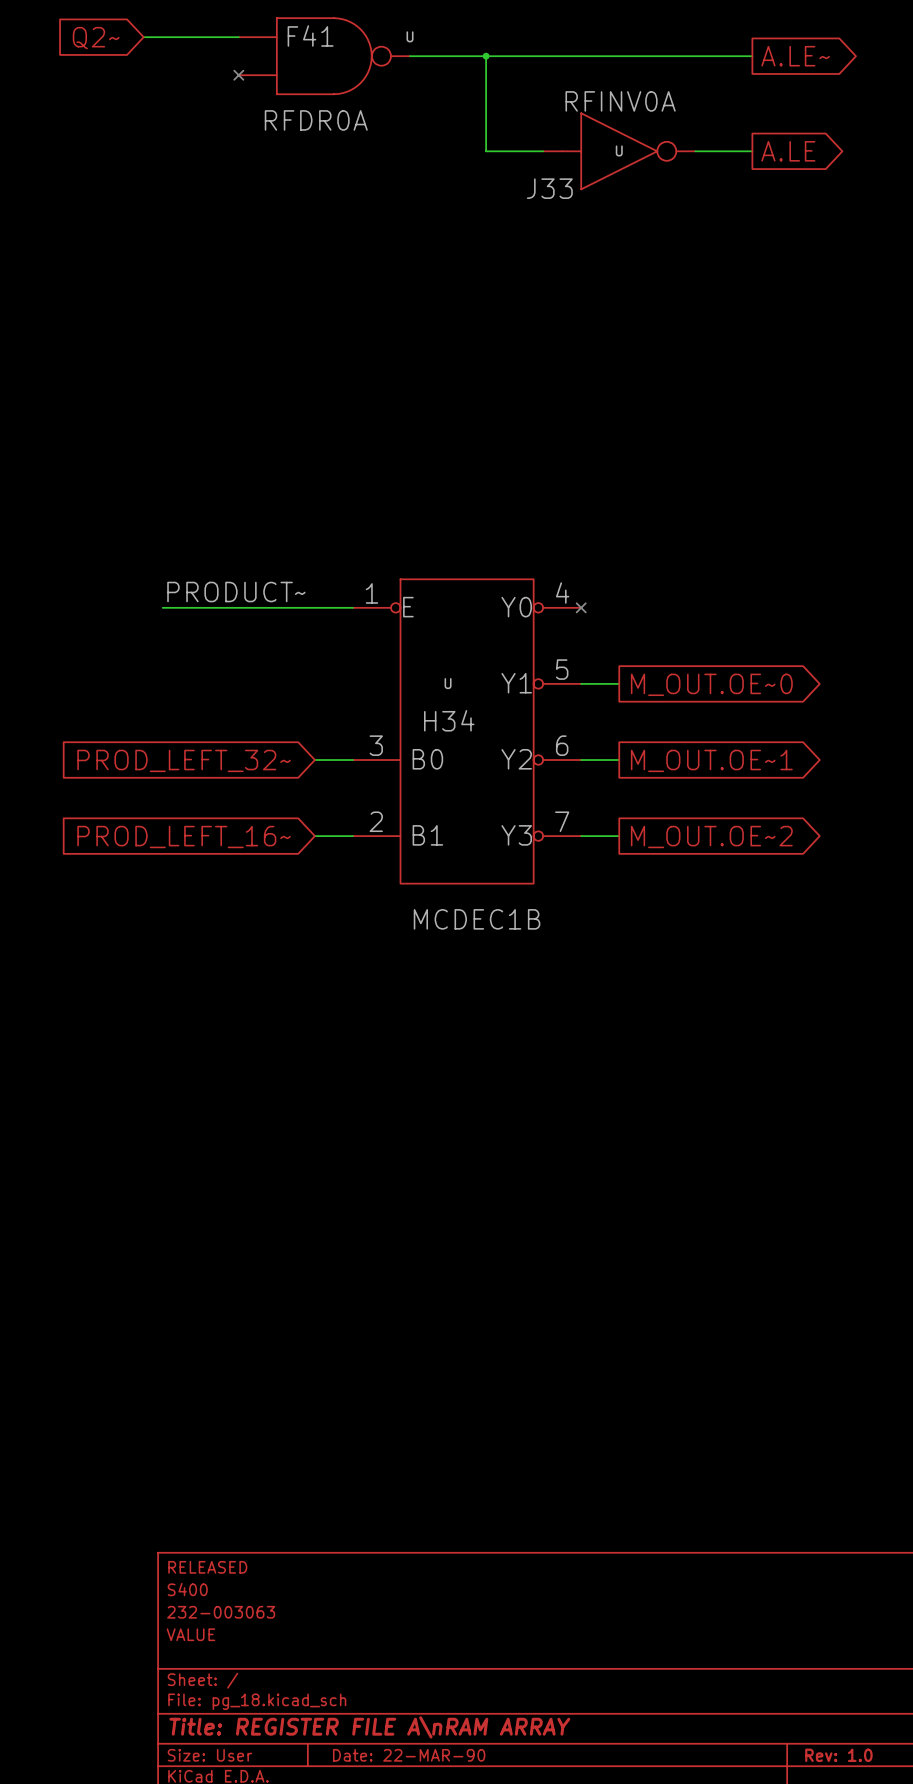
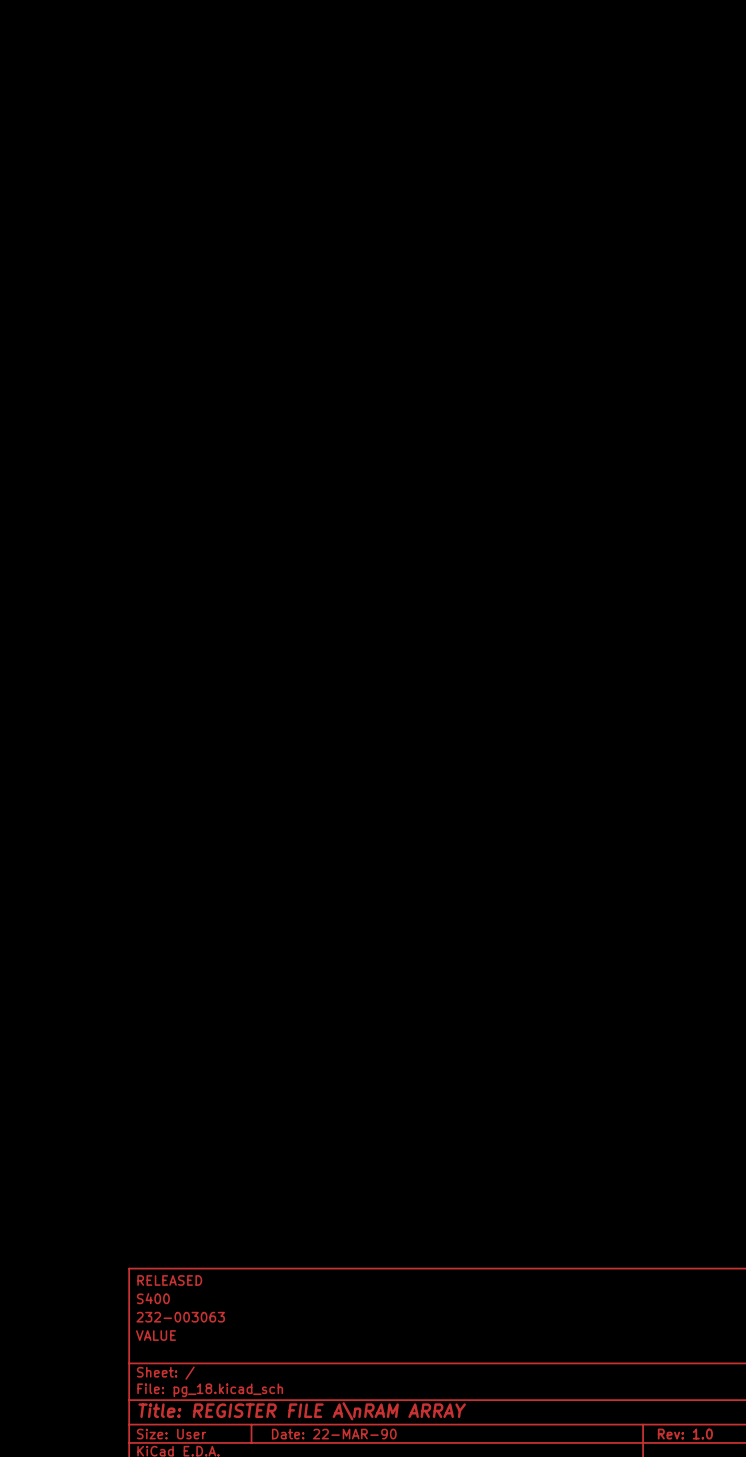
wire: (143, 37) (238, 37) -> none
global label: Q2~ (96, 38) -> none
U: (324, 56) -> none
wire: (410, 56) (752, 56) -> none
wire: (486, 56) (486, 151) (543, 151) -> none
junction: (486, 56) -> none
global label: A.LE~ (795, 56) -> none
no-connect mark: (238, 75) -> none
U: (619, 151) -> none
wire: (695, 151) (752, 151) -> none
global label: A.LE (788, 151) -> none
label: PRODUCT~ (236, 592) -> none
wire: (162, 607) (352, 607) -> none
no-connect mark: (581, 607) -> none
wire: (581, 683) (619, 683) -> none
global label: M_OUT.OE~0 (711, 684) -> none
U: (467, 731) -> none
global label: PROD_LEFT_32~ (184, 760) -> none
wire: (314, 760) (352, 760) -> none
wire: (581, 760) (619, 760) -> none
global label: M_OUT.OE~1 (711, 760) -> none
wire: (314, 836) (352, 836) -> none
wire: (581, 836) (619, 836) -> none
global label: PROD_LEFT_16~ (184, 837) -> none
global label: M_OUT.OE~2 (711, 837) -> none

